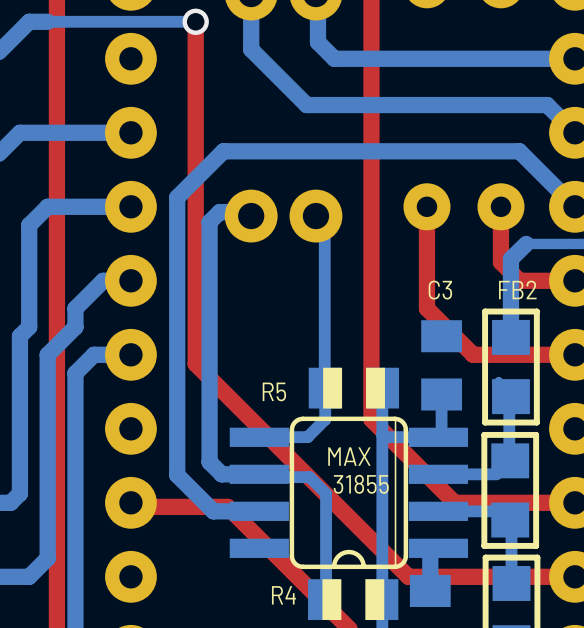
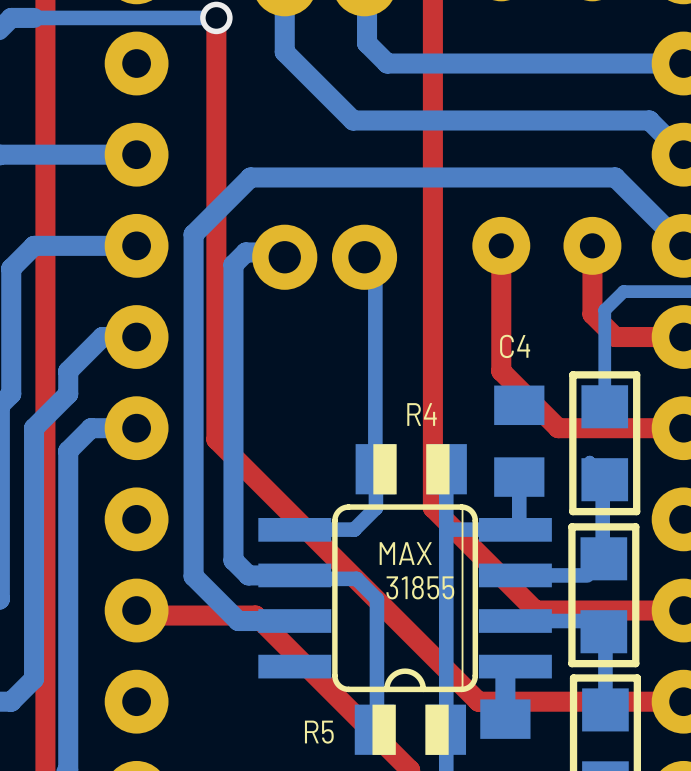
bottom track width: thick (526, 243) (510, 259) (510, 337) -> thin (623, 291) (604, 310) (604, 406)
C4 name: none -> C4 (515, 346)
text: FB2 (517, 289) -> none
text: C3 (440, 290) -> none
R4 name: none -> R4 (422, 414)
text: R5 (274, 391) -> none
text: R4 (283, 595) -> none
R5 name: none -> R5 (319, 732)

